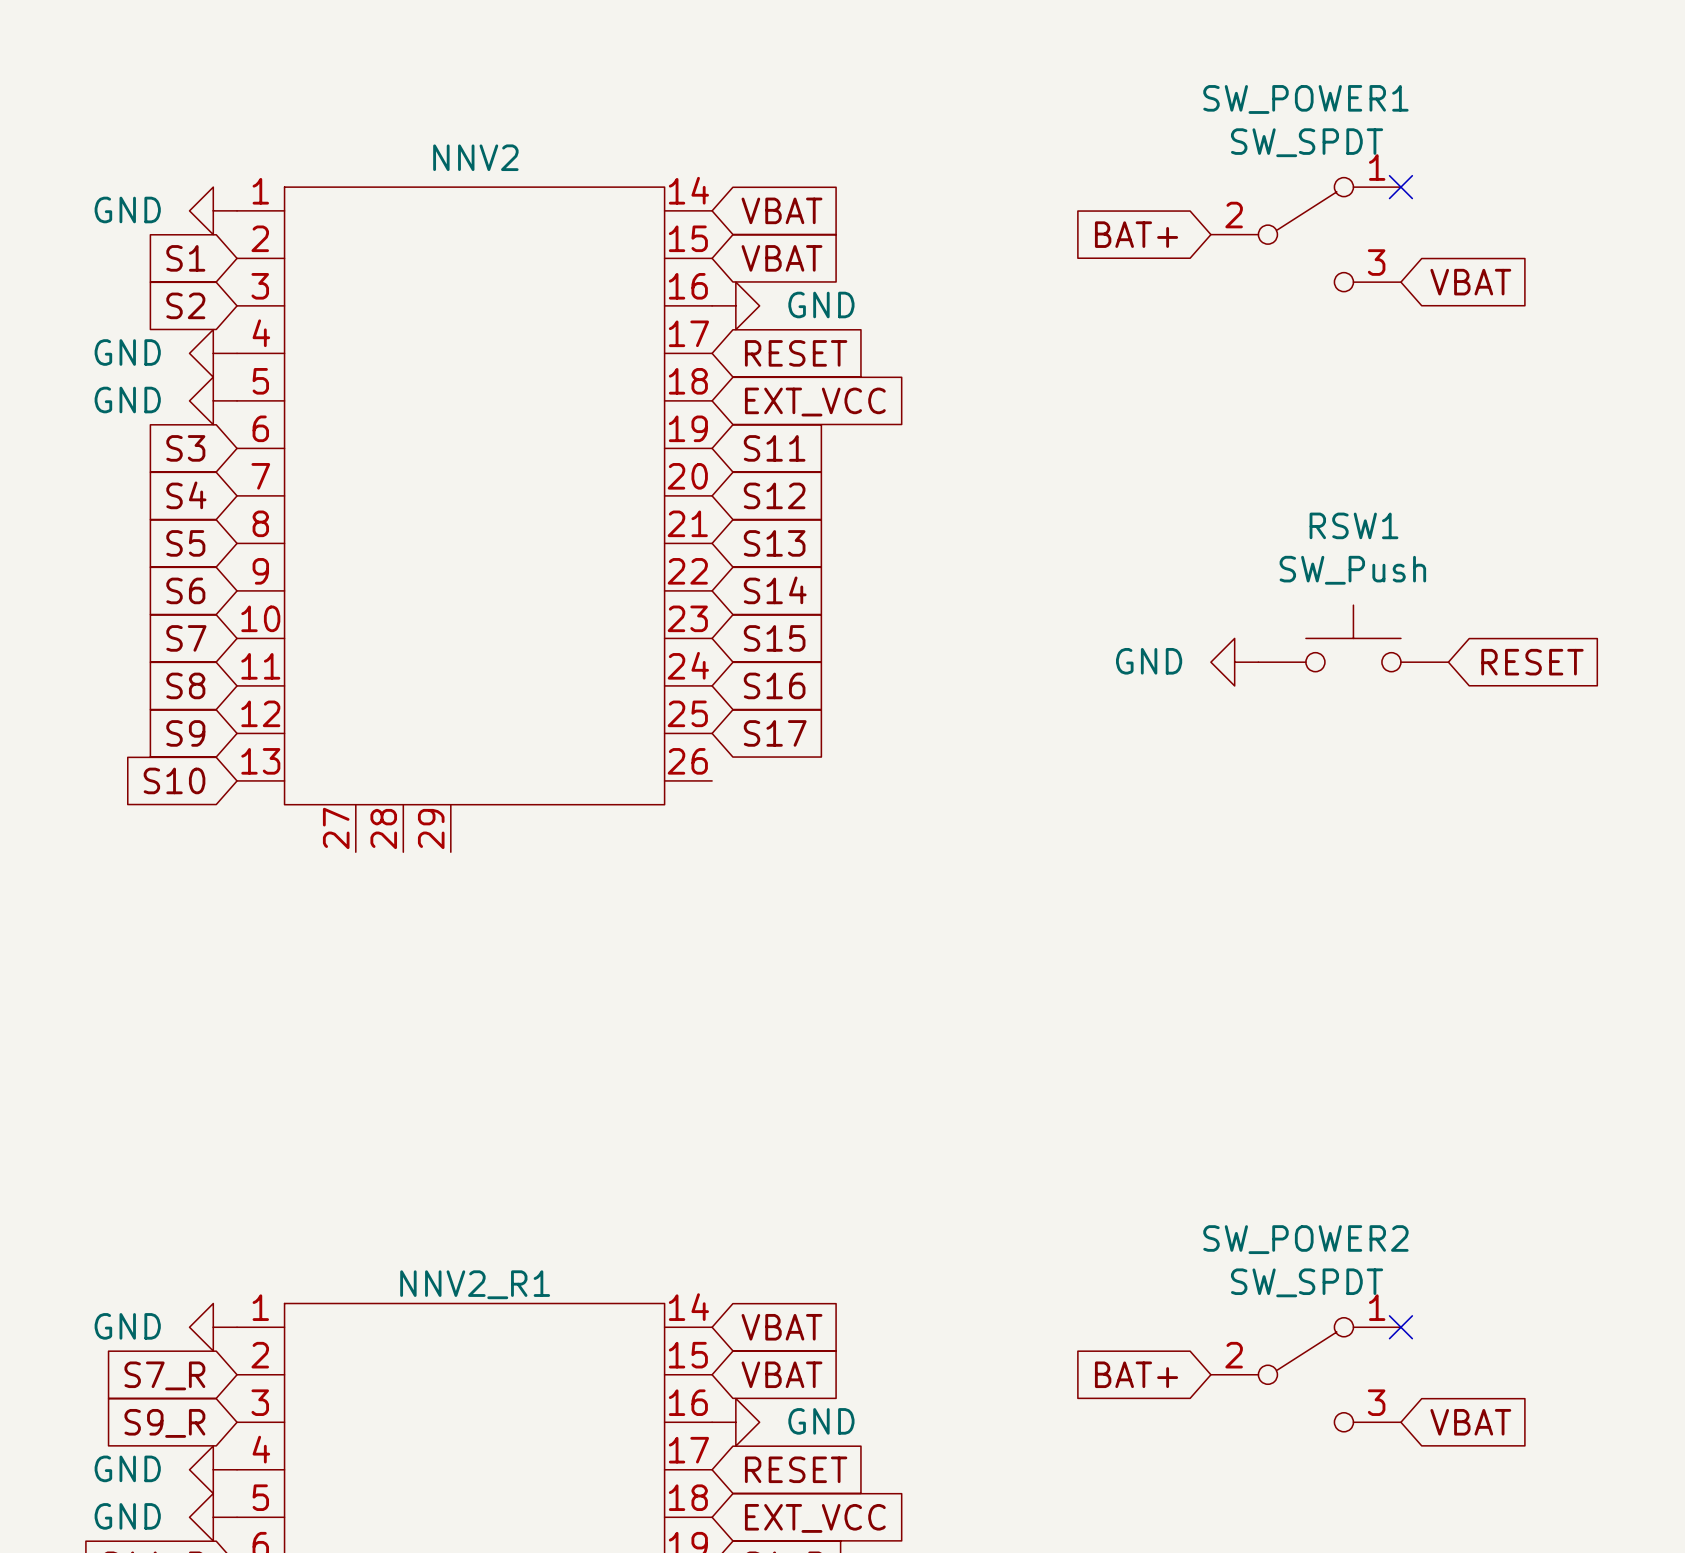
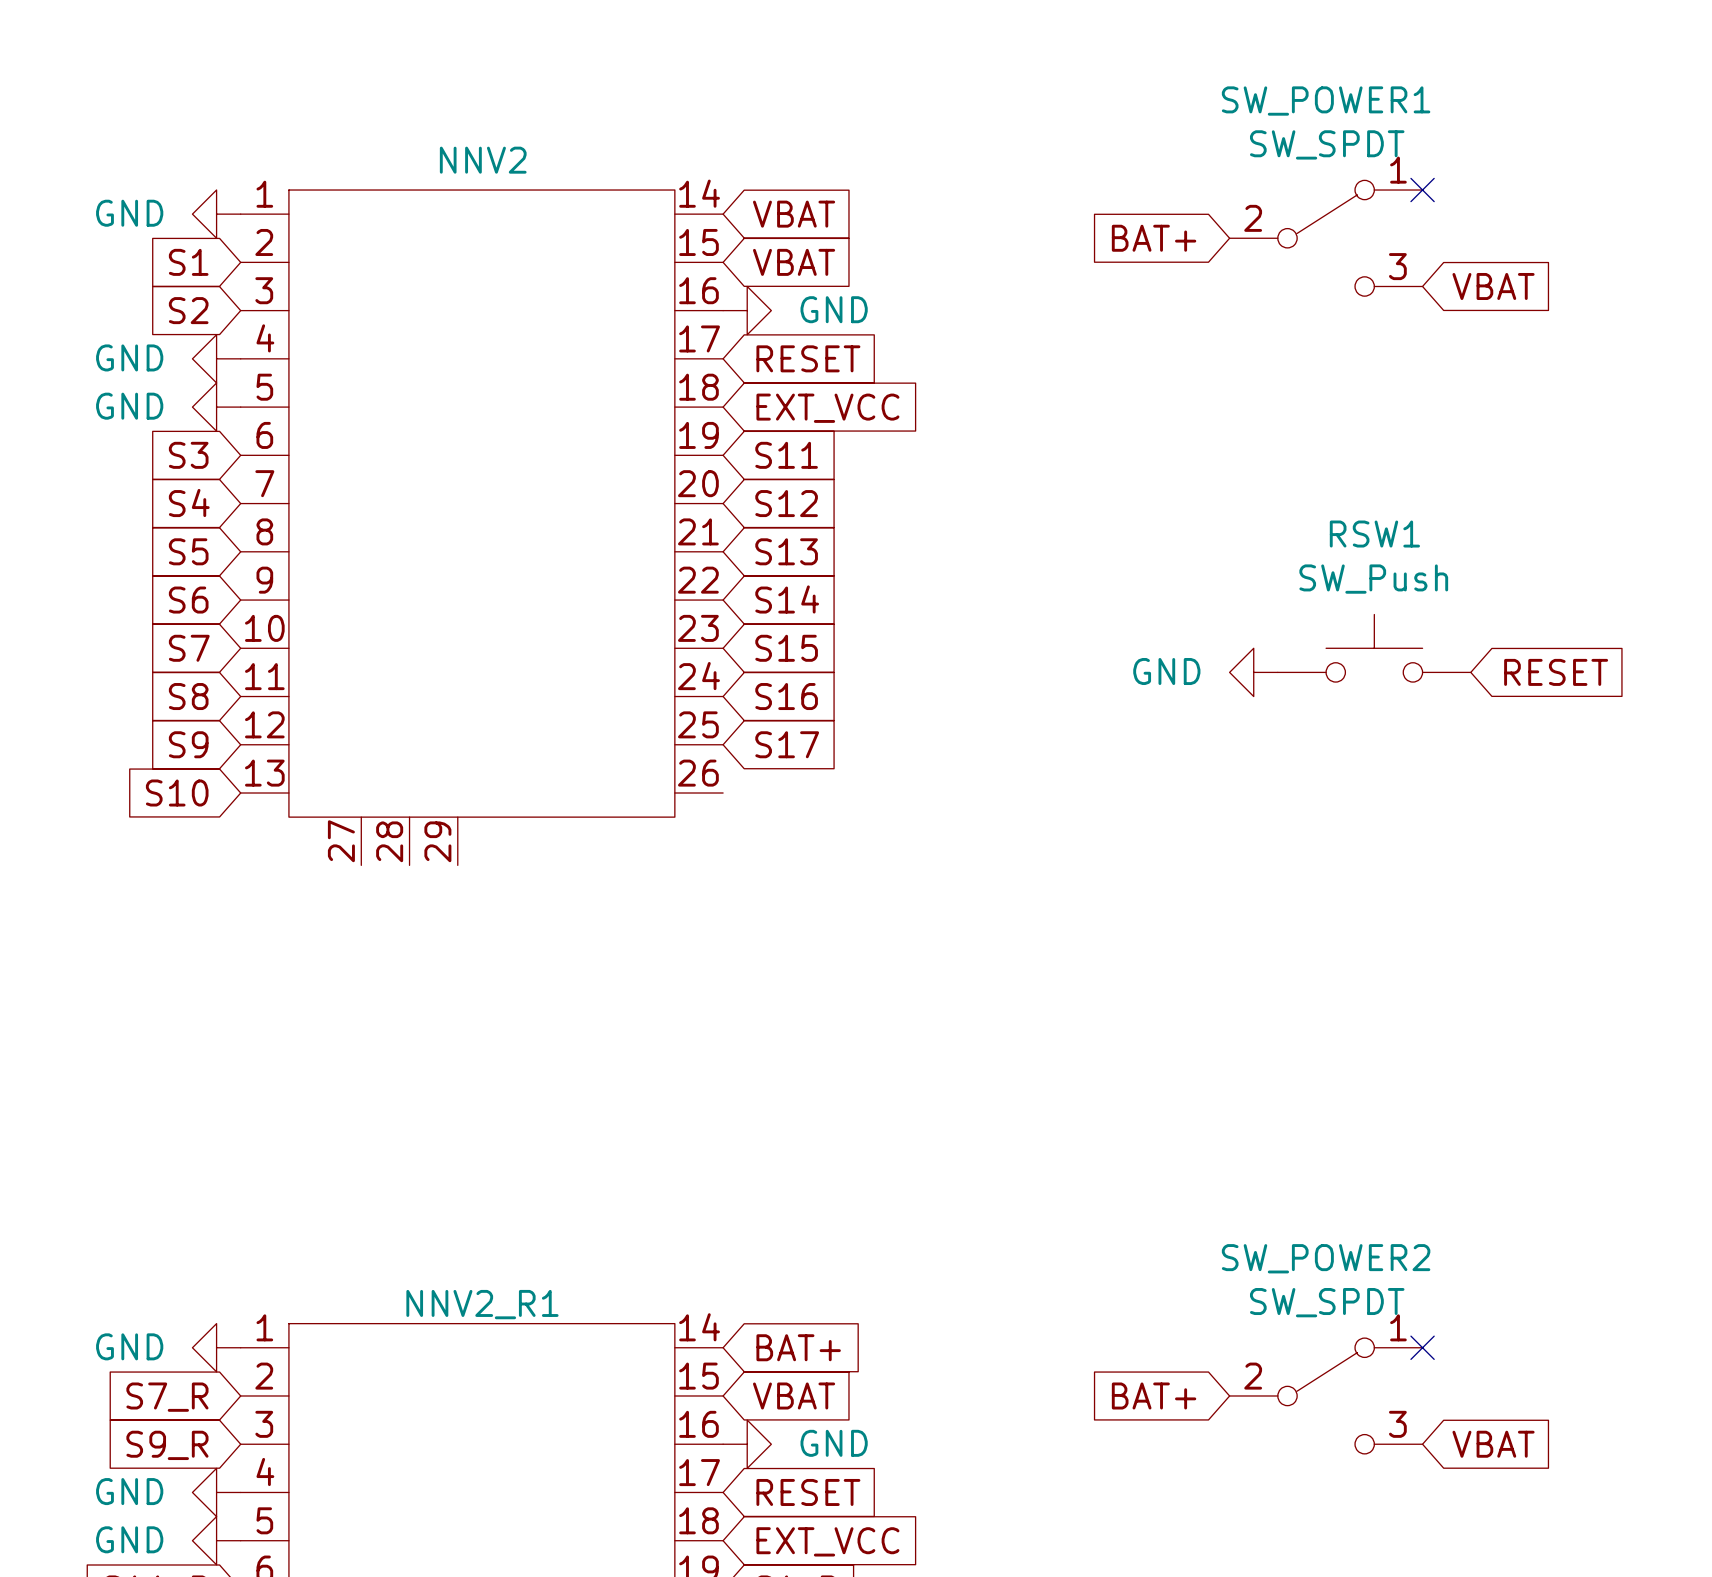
global label: VBAT (781, 1327) -> BAT+ (798, 1347)

